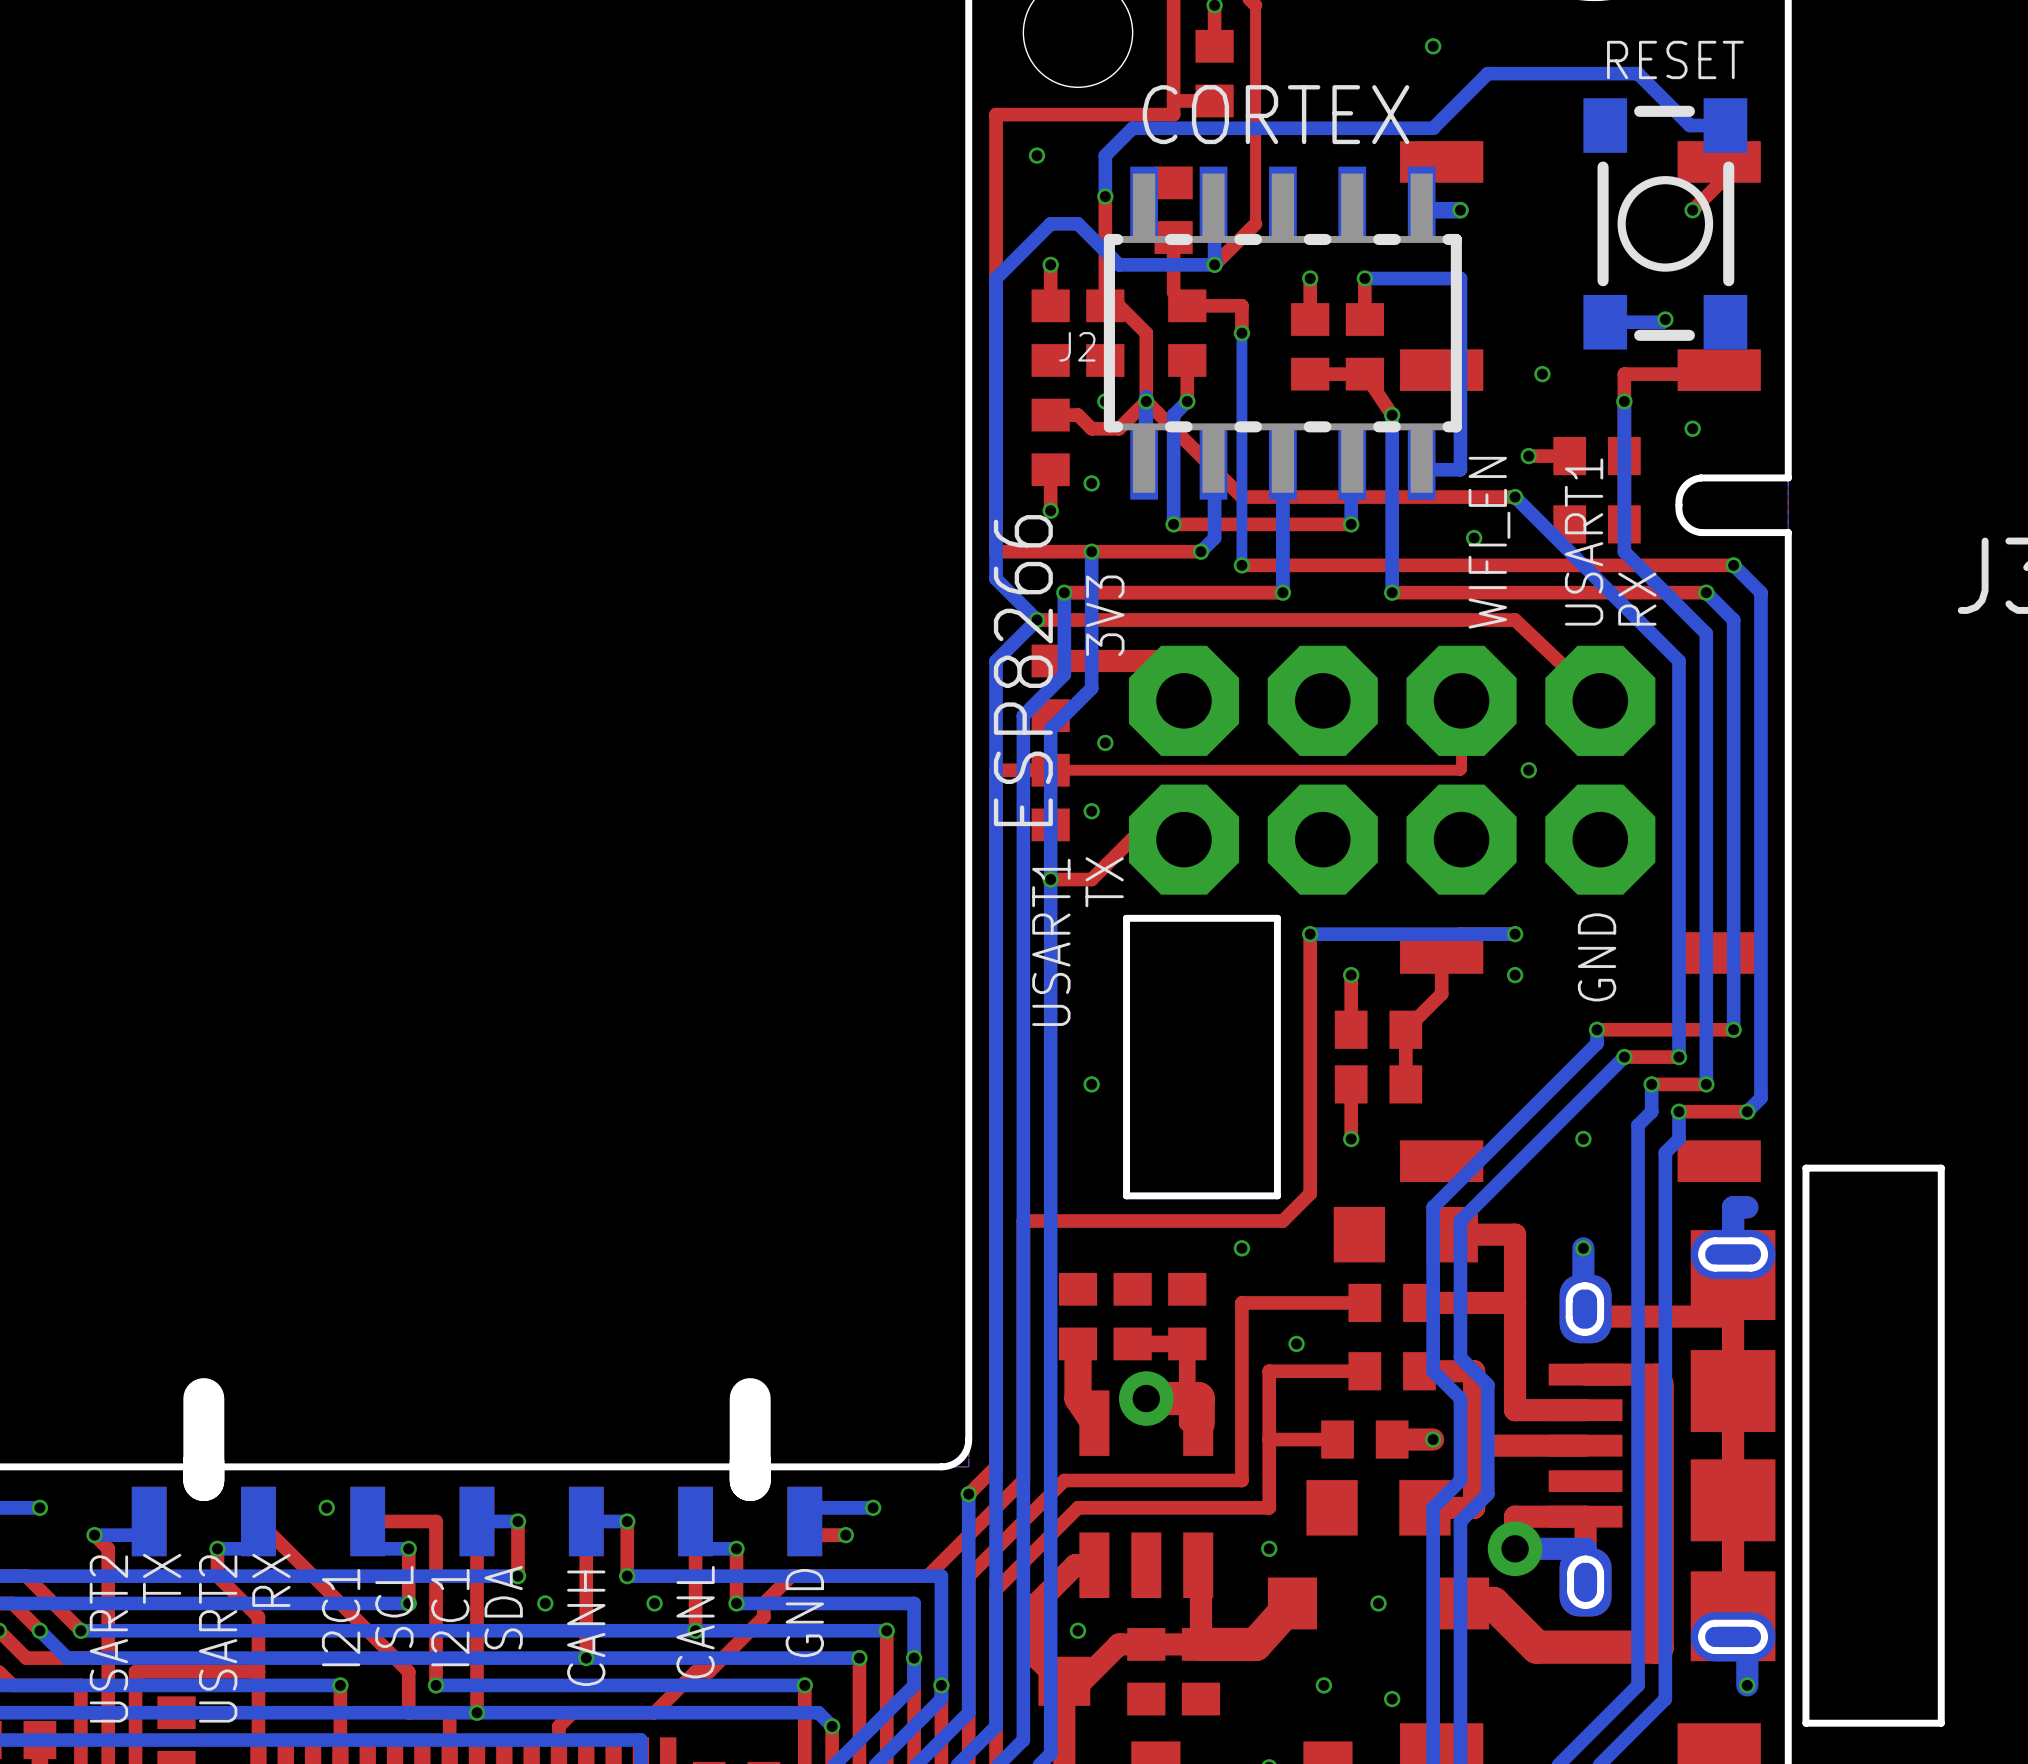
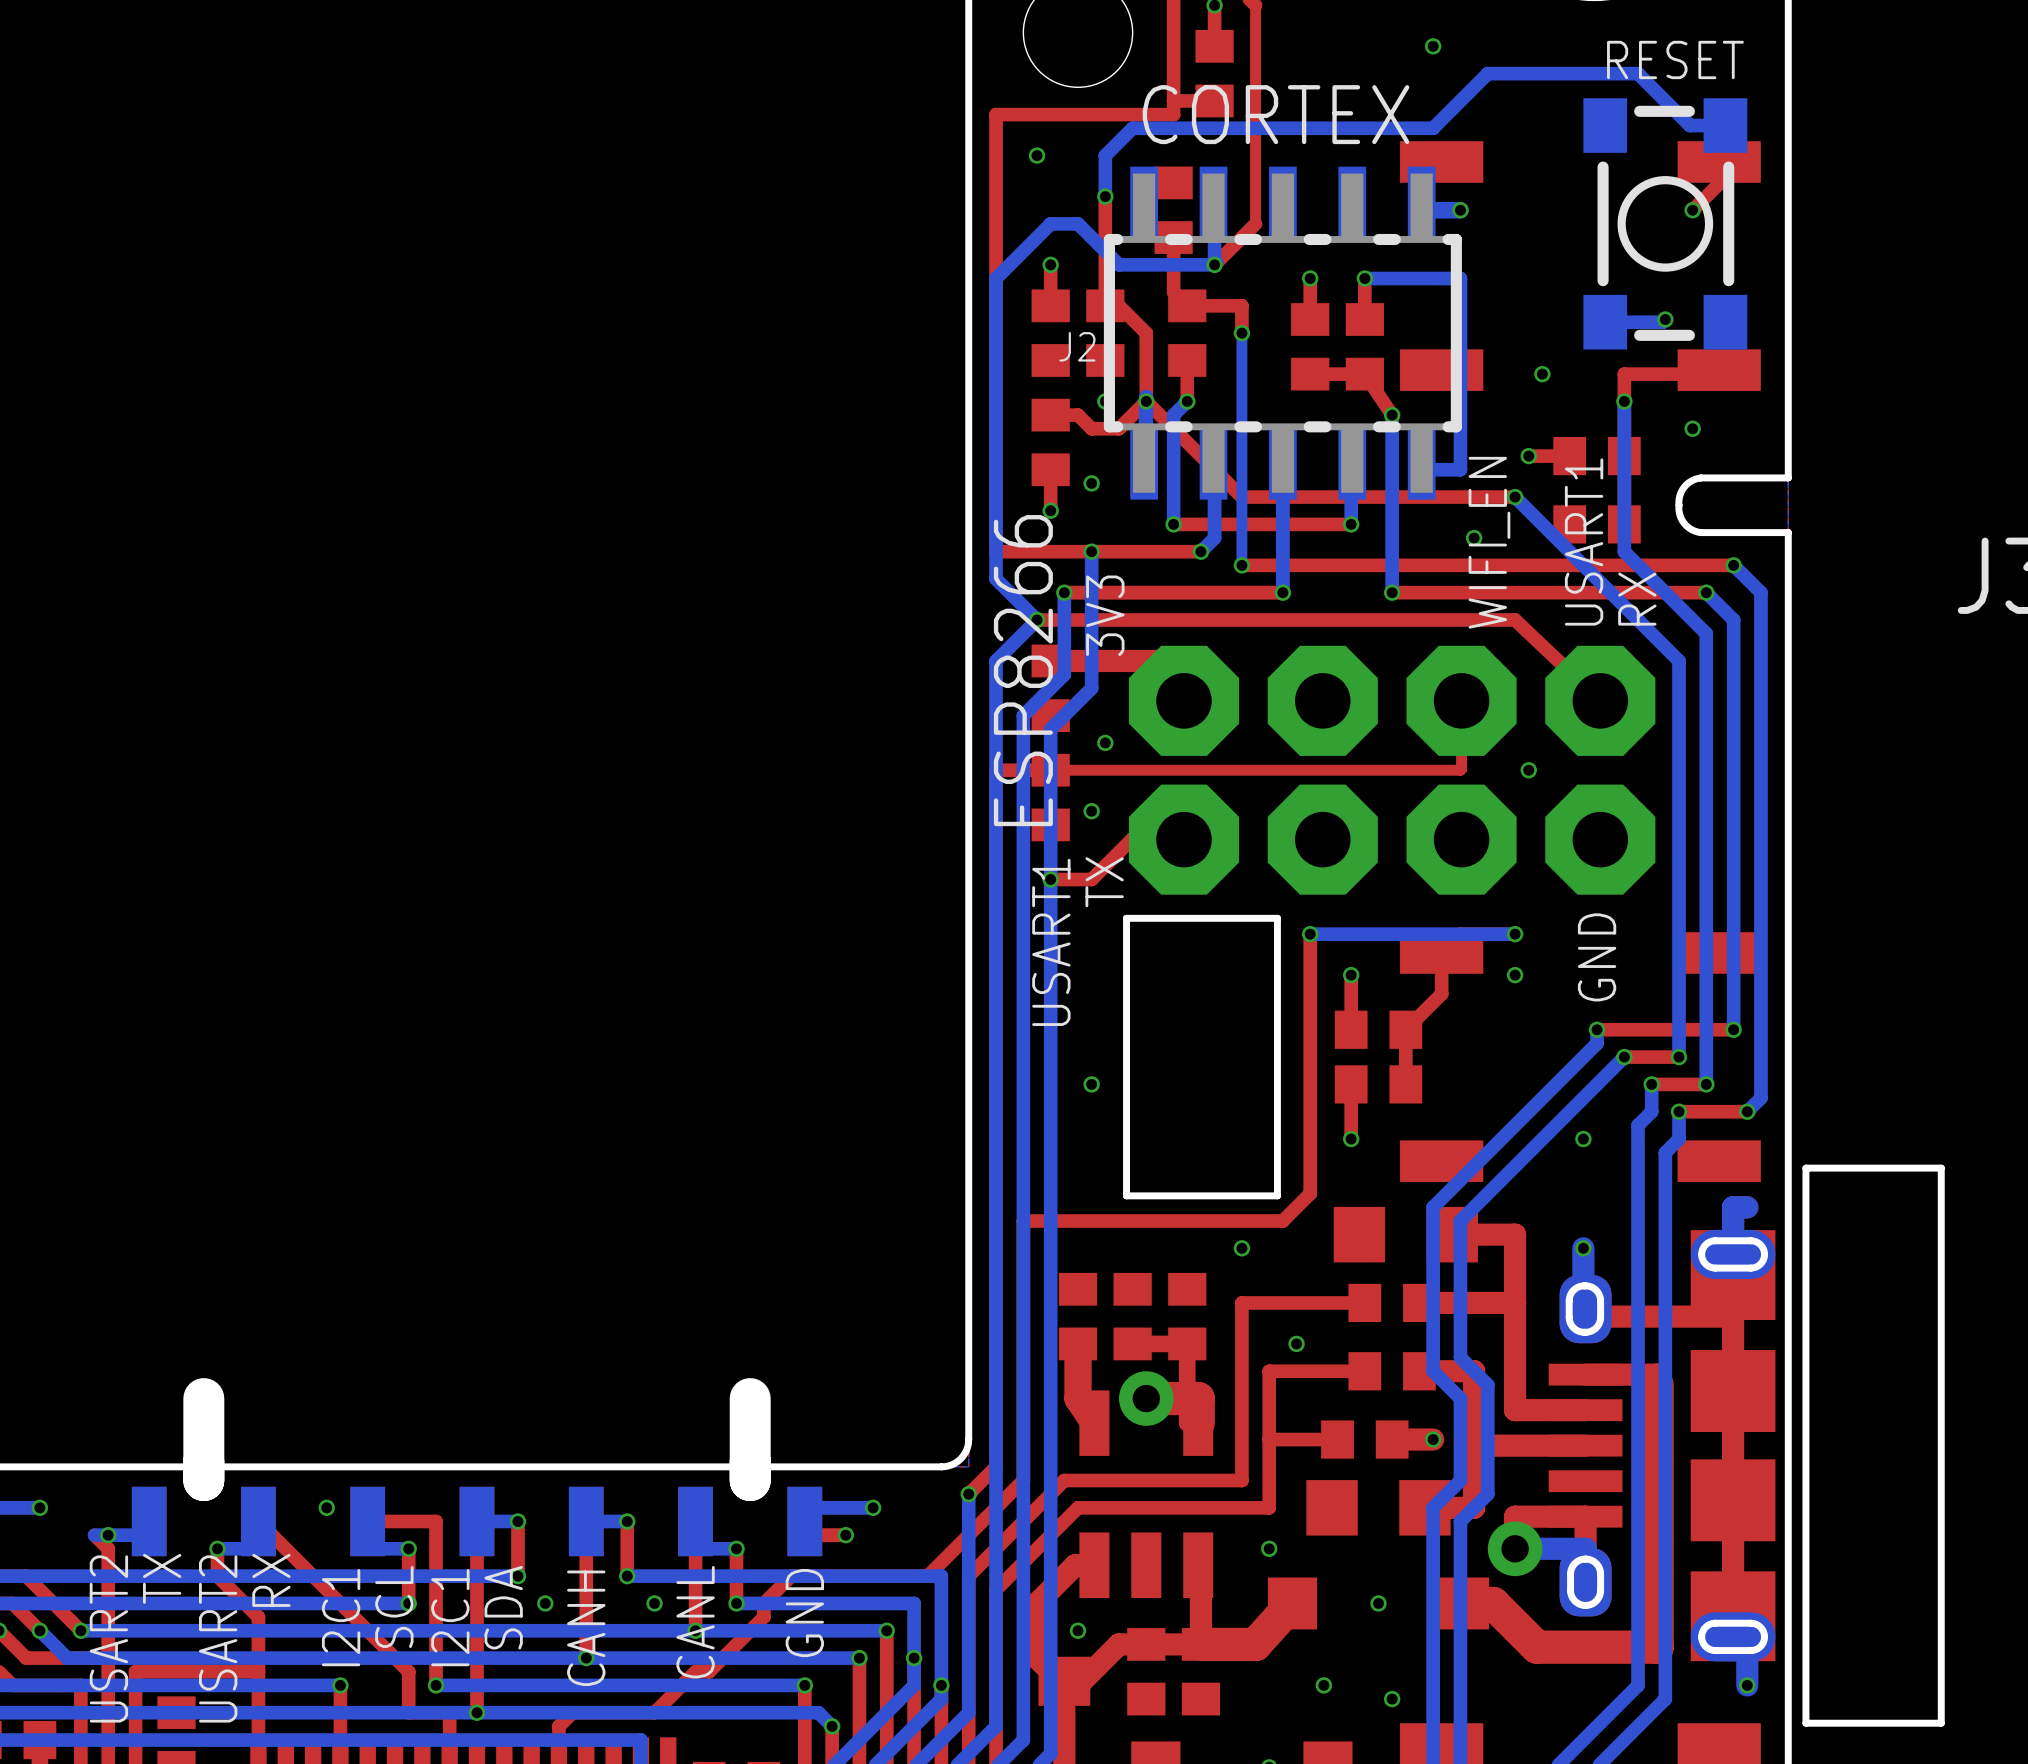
via position: (94, 1535) -> (108, 1535)

